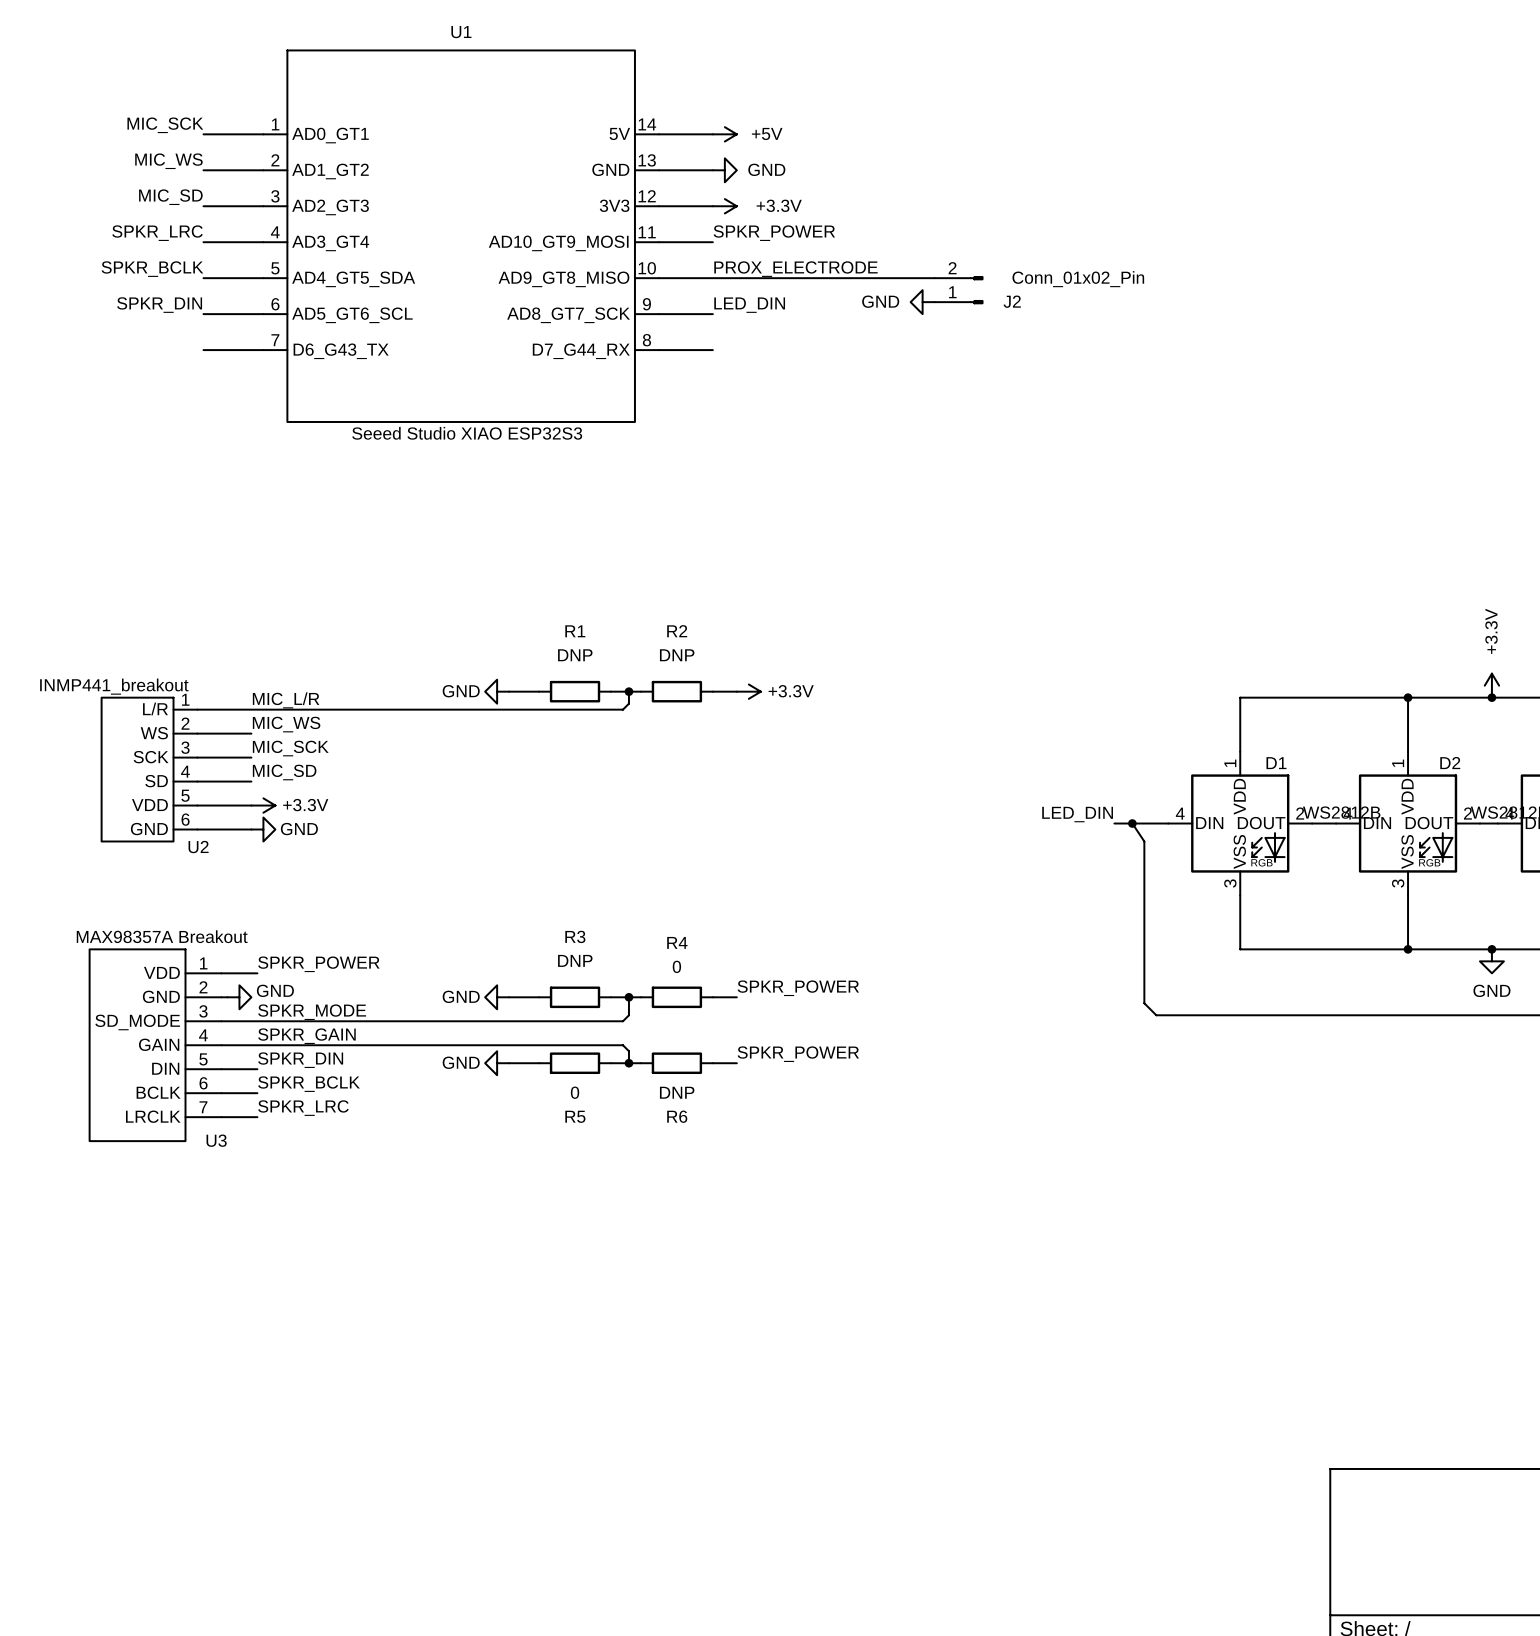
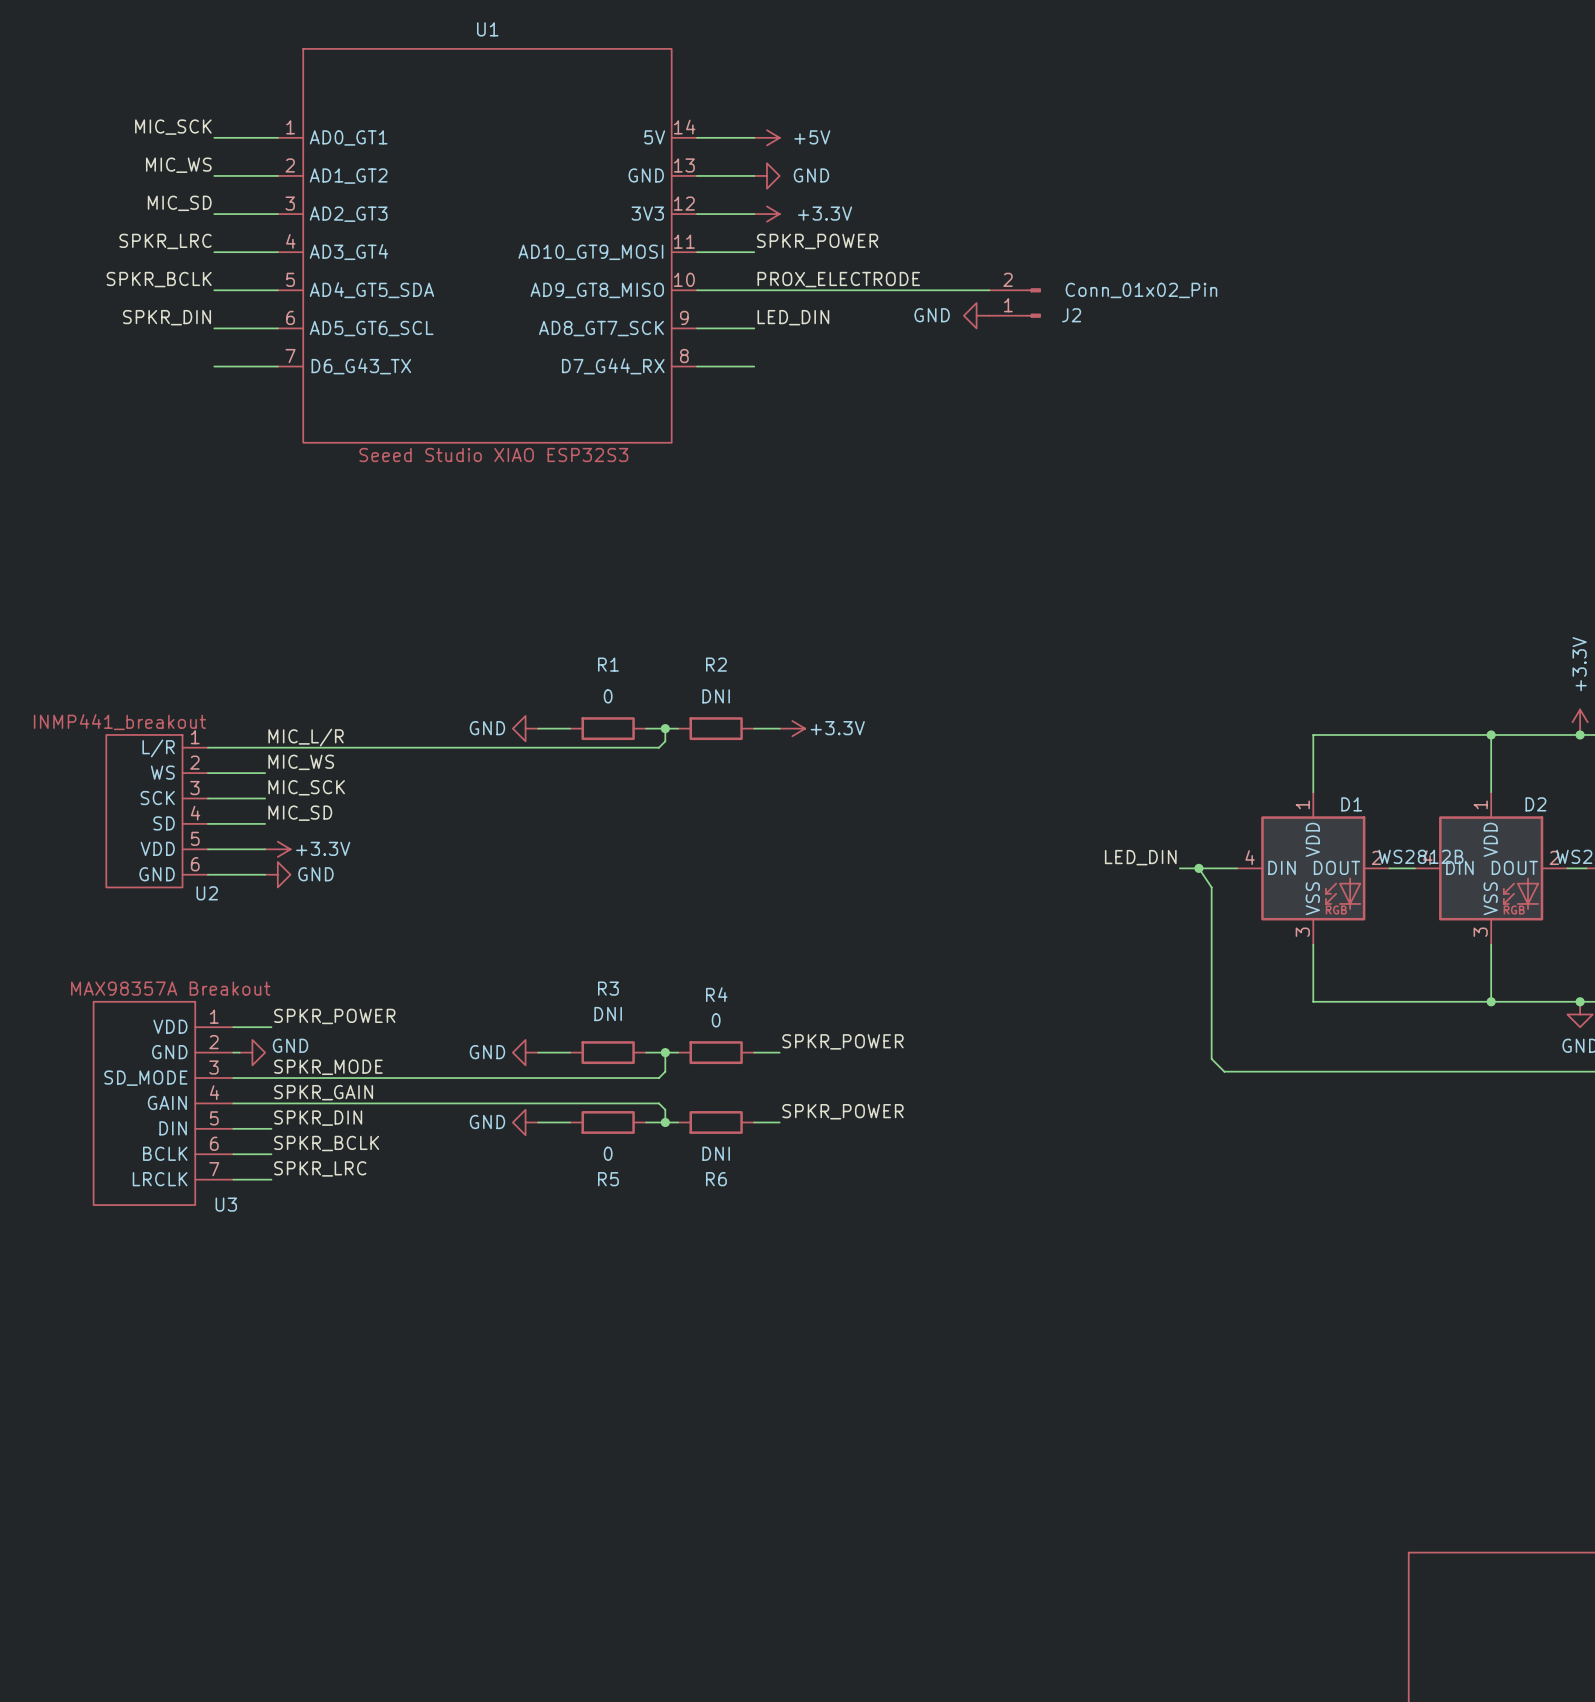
R1 value: DNP (575, 655) -> 0 (608, 696)
R2 value: DNP (677, 655) -> DNI (716, 696)
R3 value: DNP (575, 960) -> DNI (608, 1014)
R6 value: DNP (677, 1092) -> DNI (716, 1153)

